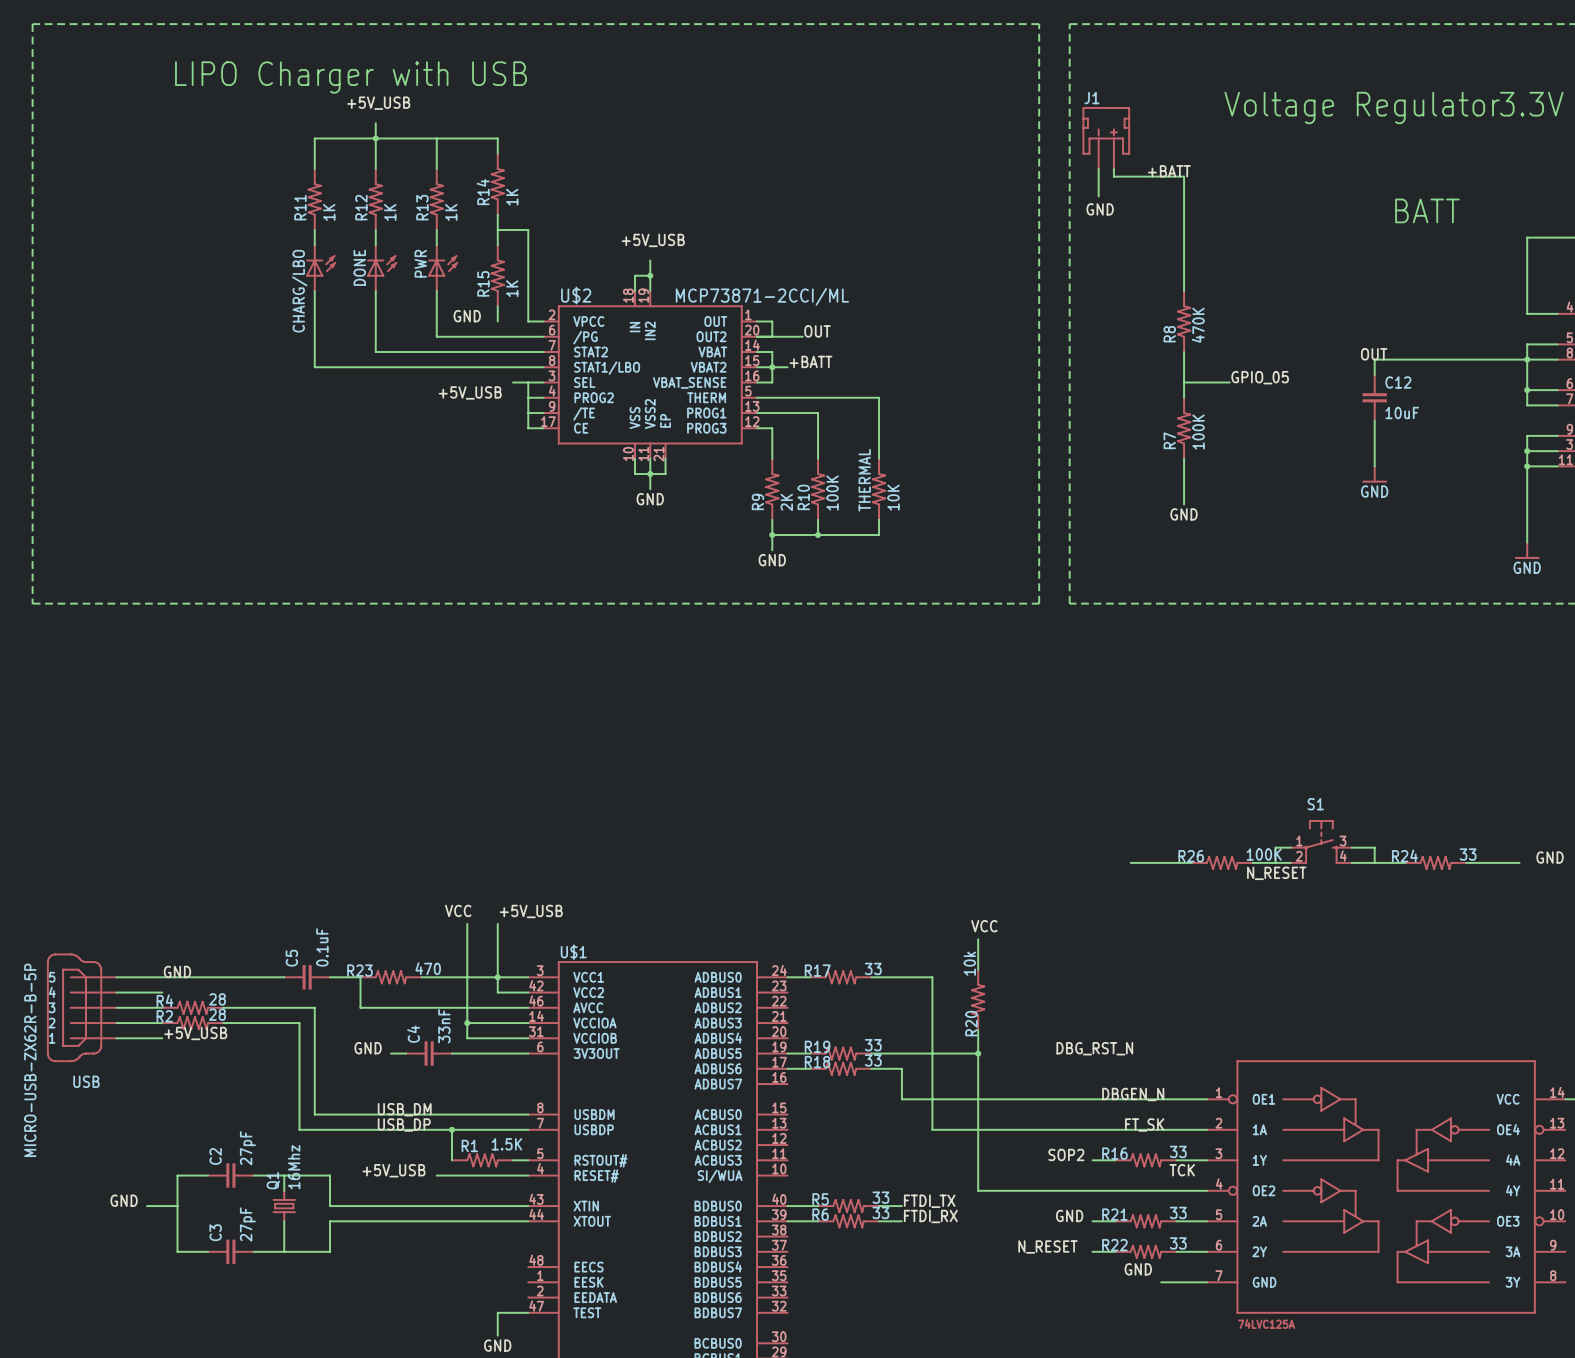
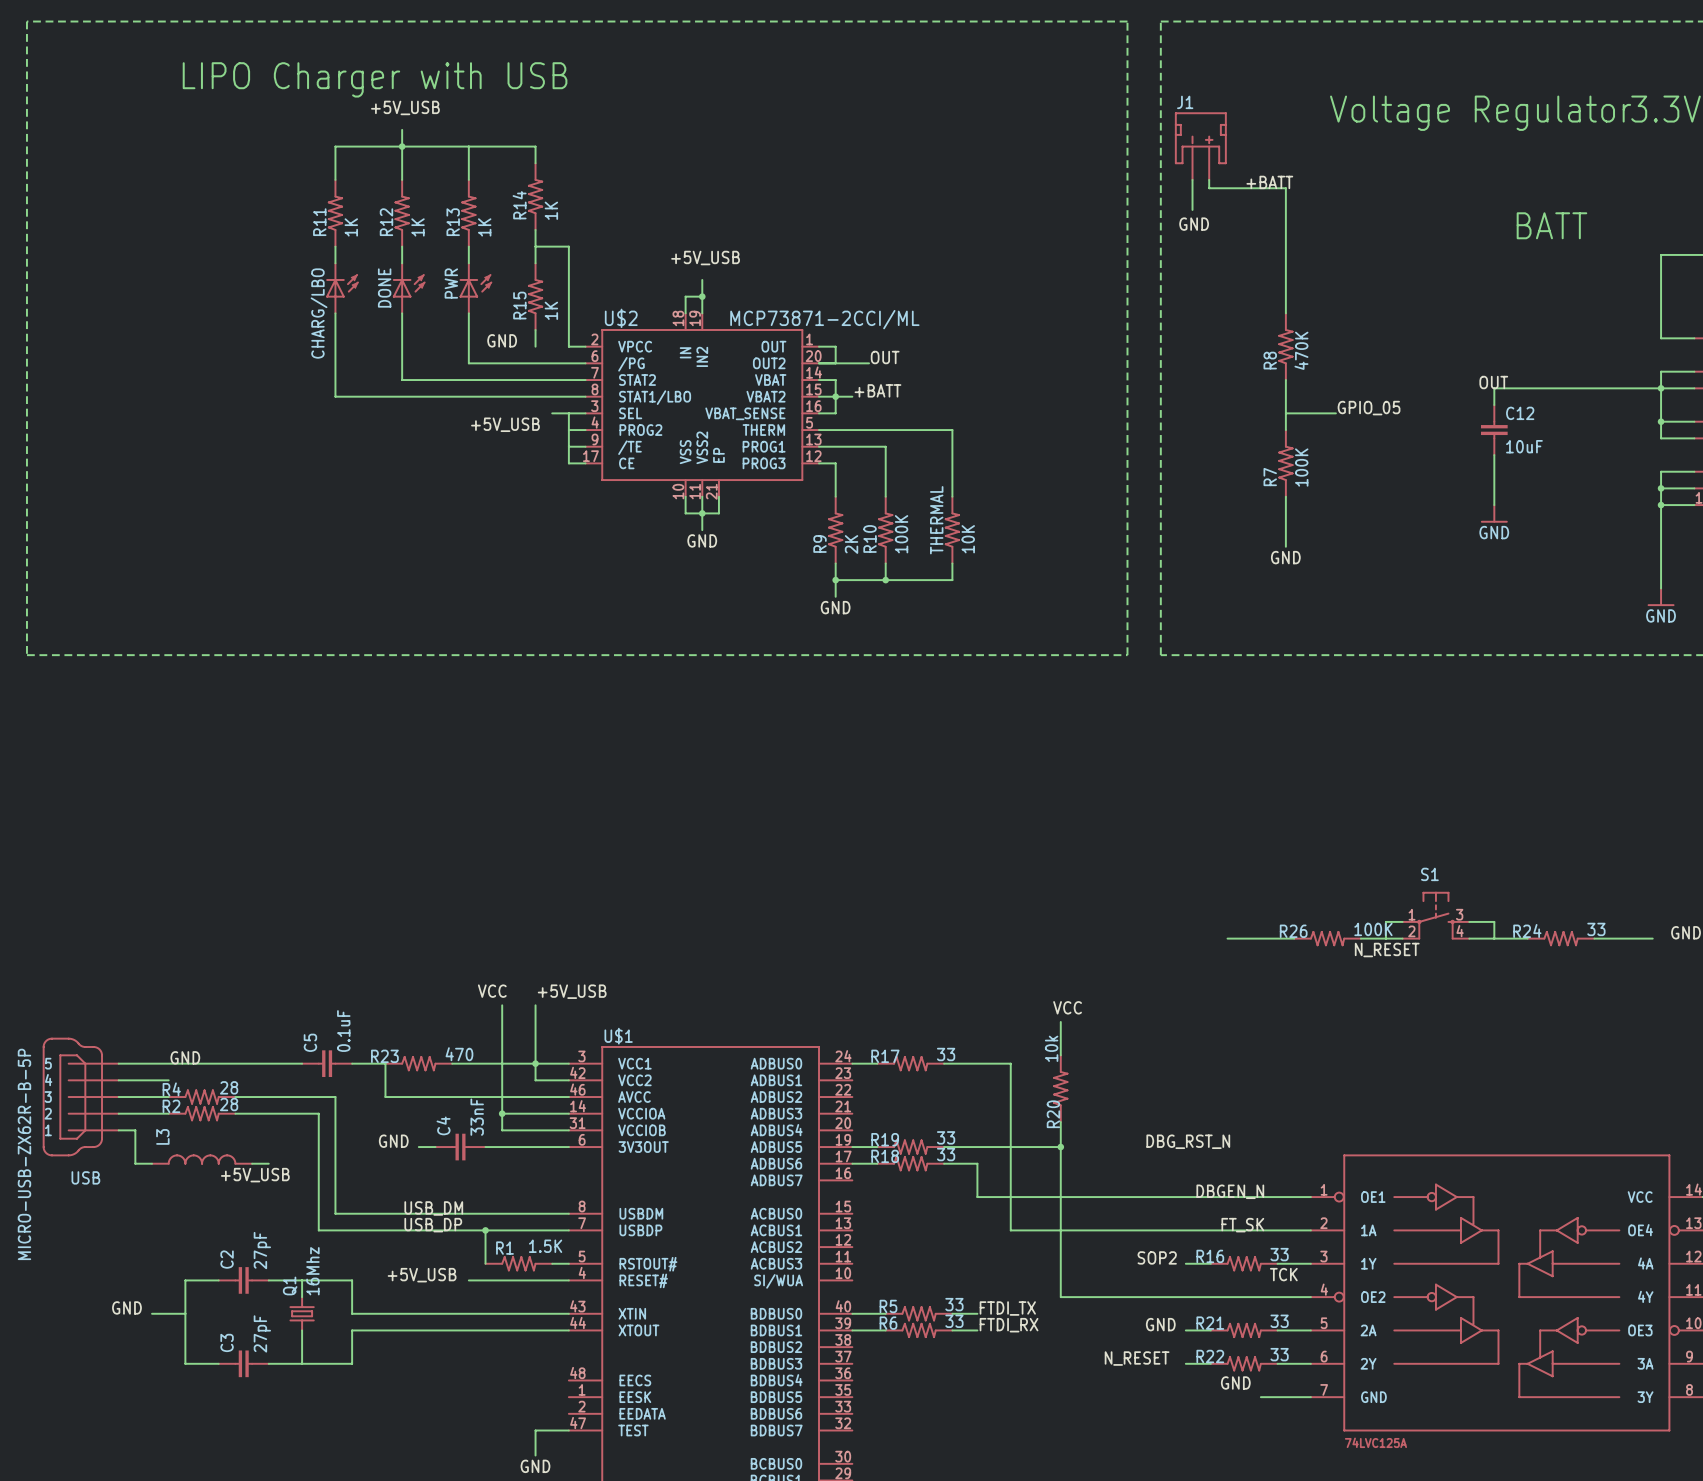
label position: +5V_USB (195, 1033) -> +5V_USB (255, 1175)
wire: (131, 1038) (162, 1038) -> (135, 1130) (135, 1163) (152, 1163)
L3: none -> (202, 1159)
wire: none -> (252, 1163) (268, 1163)

